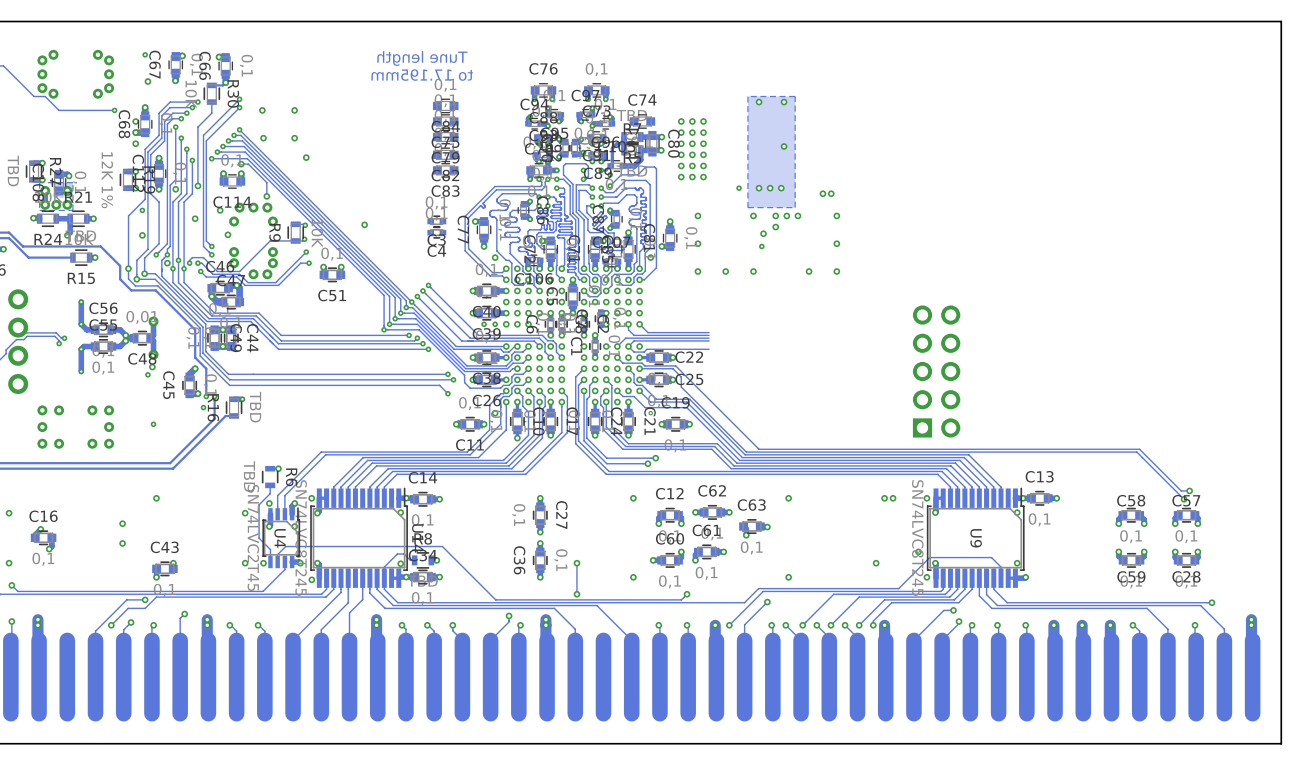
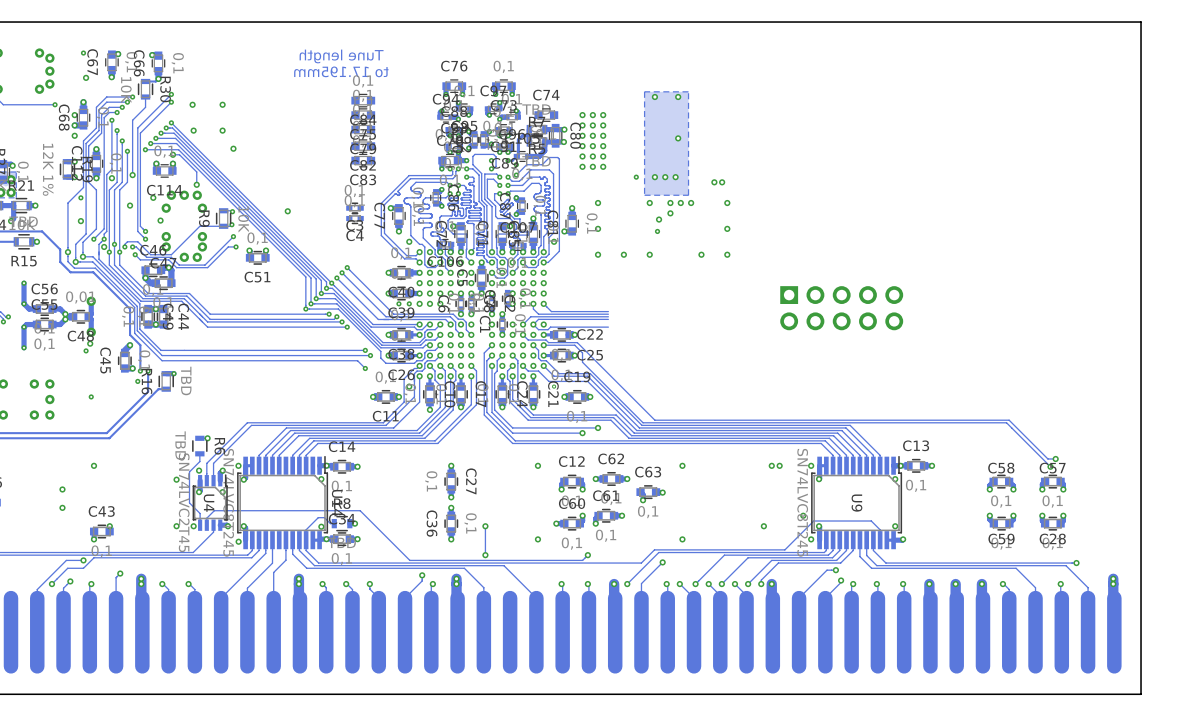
part rotation: 0° (936, 371) -> 90° clockwise (841, 308)
track: (606, 457) (655, 458) -> (512, 427) (598, 427)
via: none -> (598, 427)
via: (655, 458) -> none
track: (606, 463) (647, 463) -> (512, 433) (582, 433)
via: (647, 463) -> none
via: none -> (582, 433)

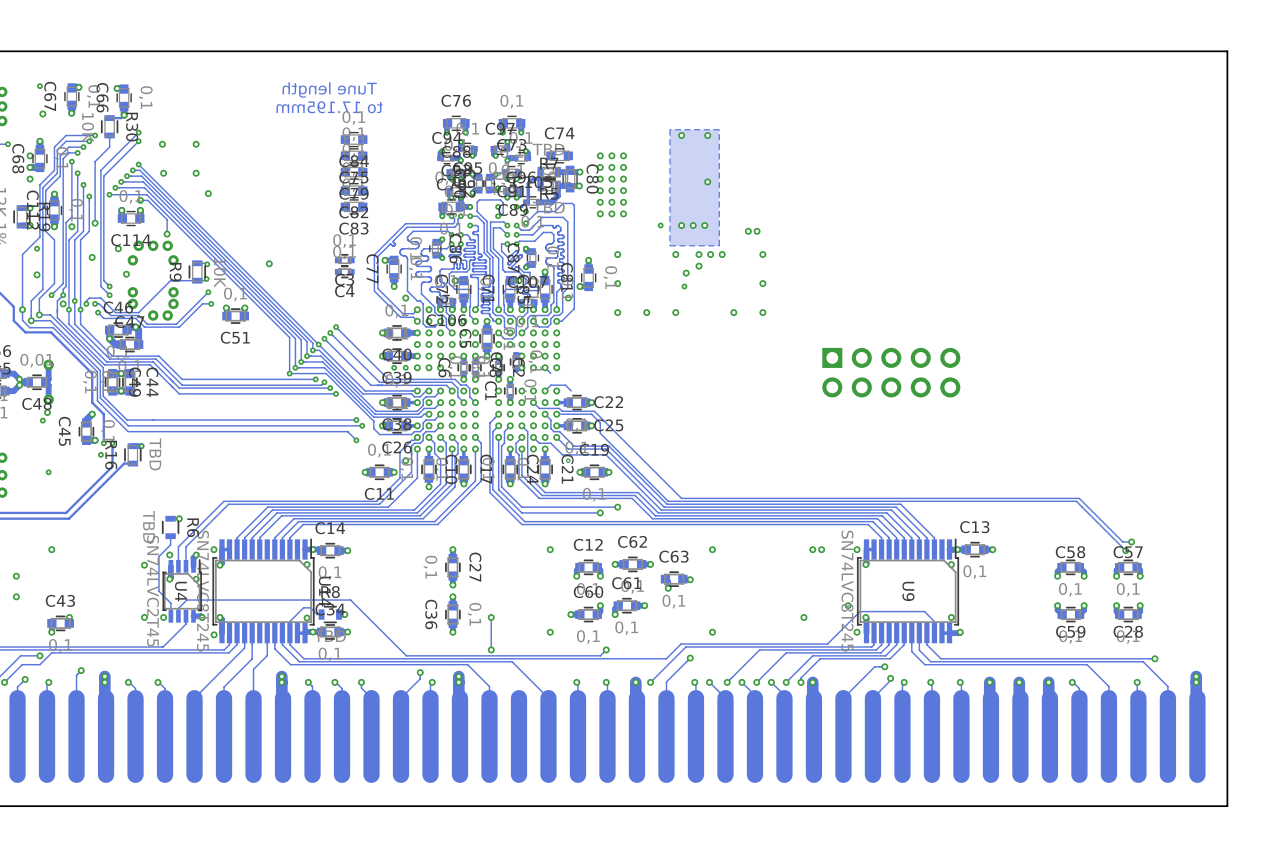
track: (533, 303) (533, 309) (538, 314) (608, 314) -> (545, 367) (550, 373)
track: (543, 303) (551, 311) (608, 311) -> none
track: (608, 316) (530, 316) (523, 324) -> none
track: (608, 319) (551, 319) -> (571, 391) (565, 385)
track: (533, 324) (538, 329) (548, 329) (550, 327) (608, 327) -> none

